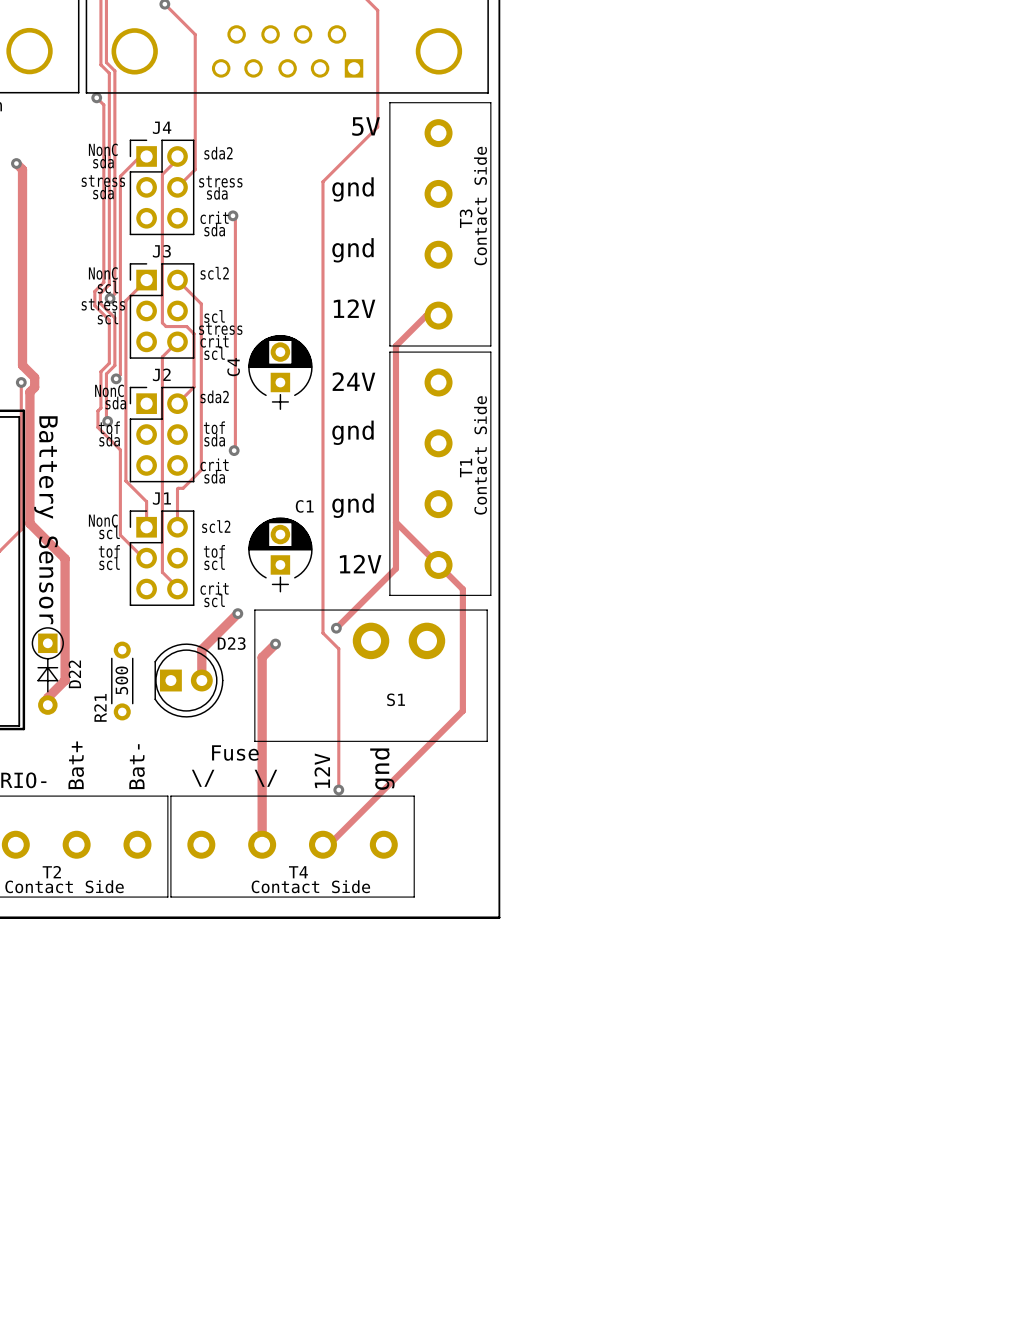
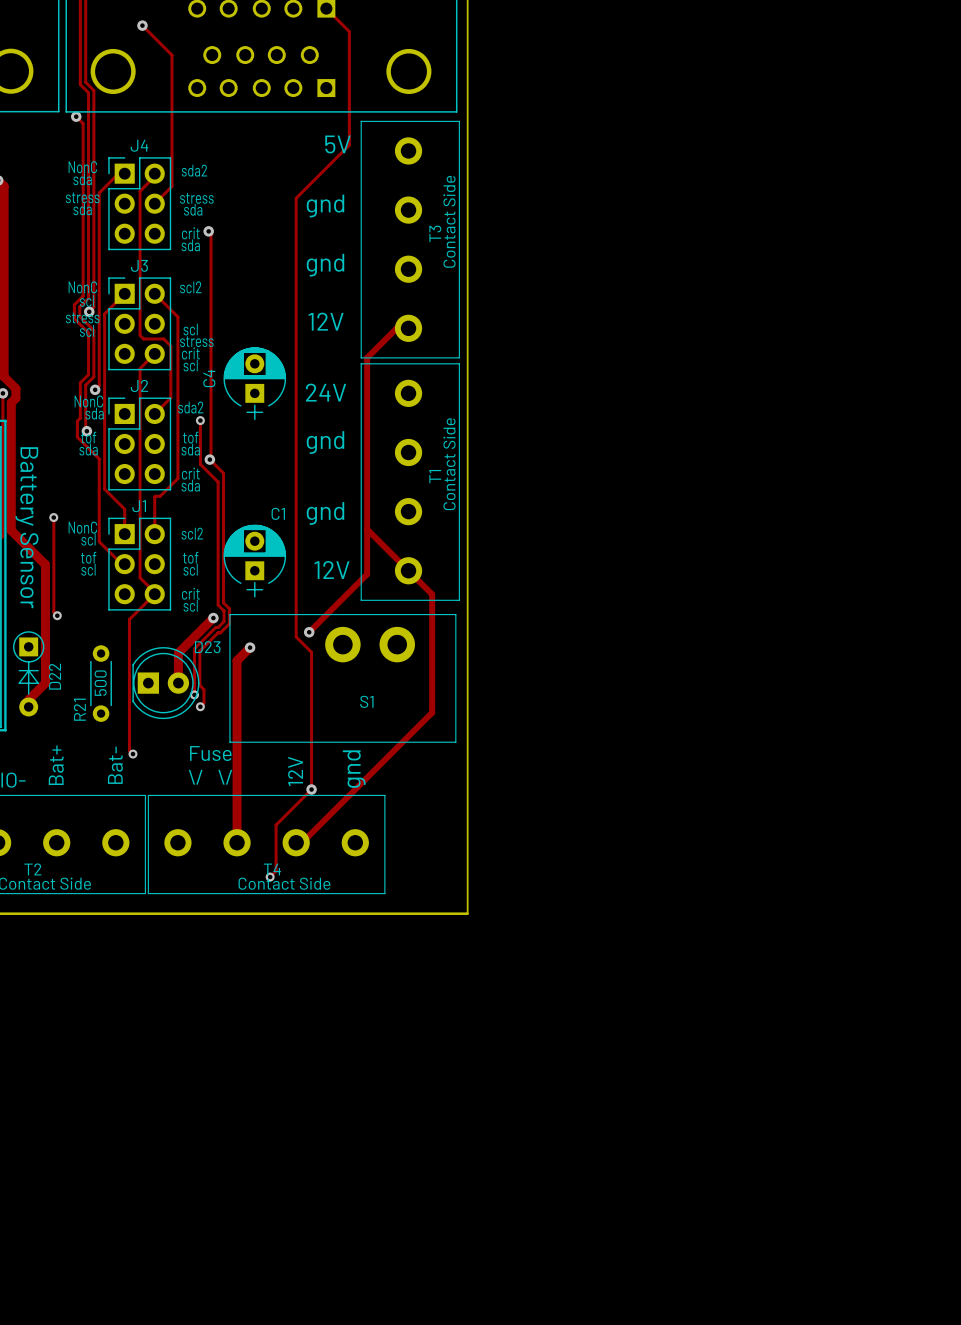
track: none -> (200, 420) (200, 464) (218, 482) (218, 605) (224, 610) (224, 621) (194, 648) (194, 694)
via: none -> (200, 420)
track: none -> (209, 459) (223, 473) (223, 602) (229, 608) (229, 623) (199, 651) (199, 685) (203, 689) (203, 703) (200, 706)
track: none -> (53, 517) (53, 612) (57, 615)
via: none -> (53, 517)
track: none -> (154, 594) (129, 619) (129, 750) (133, 754)
via: none -> (57, 615)
via: none -> (194, 694)
via: none -> (200, 706)
via: none -> (133, 754)
track: none -> (311, 789) (276, 825) (276, 871) (270, 877)
via: none -> (270, 877)

